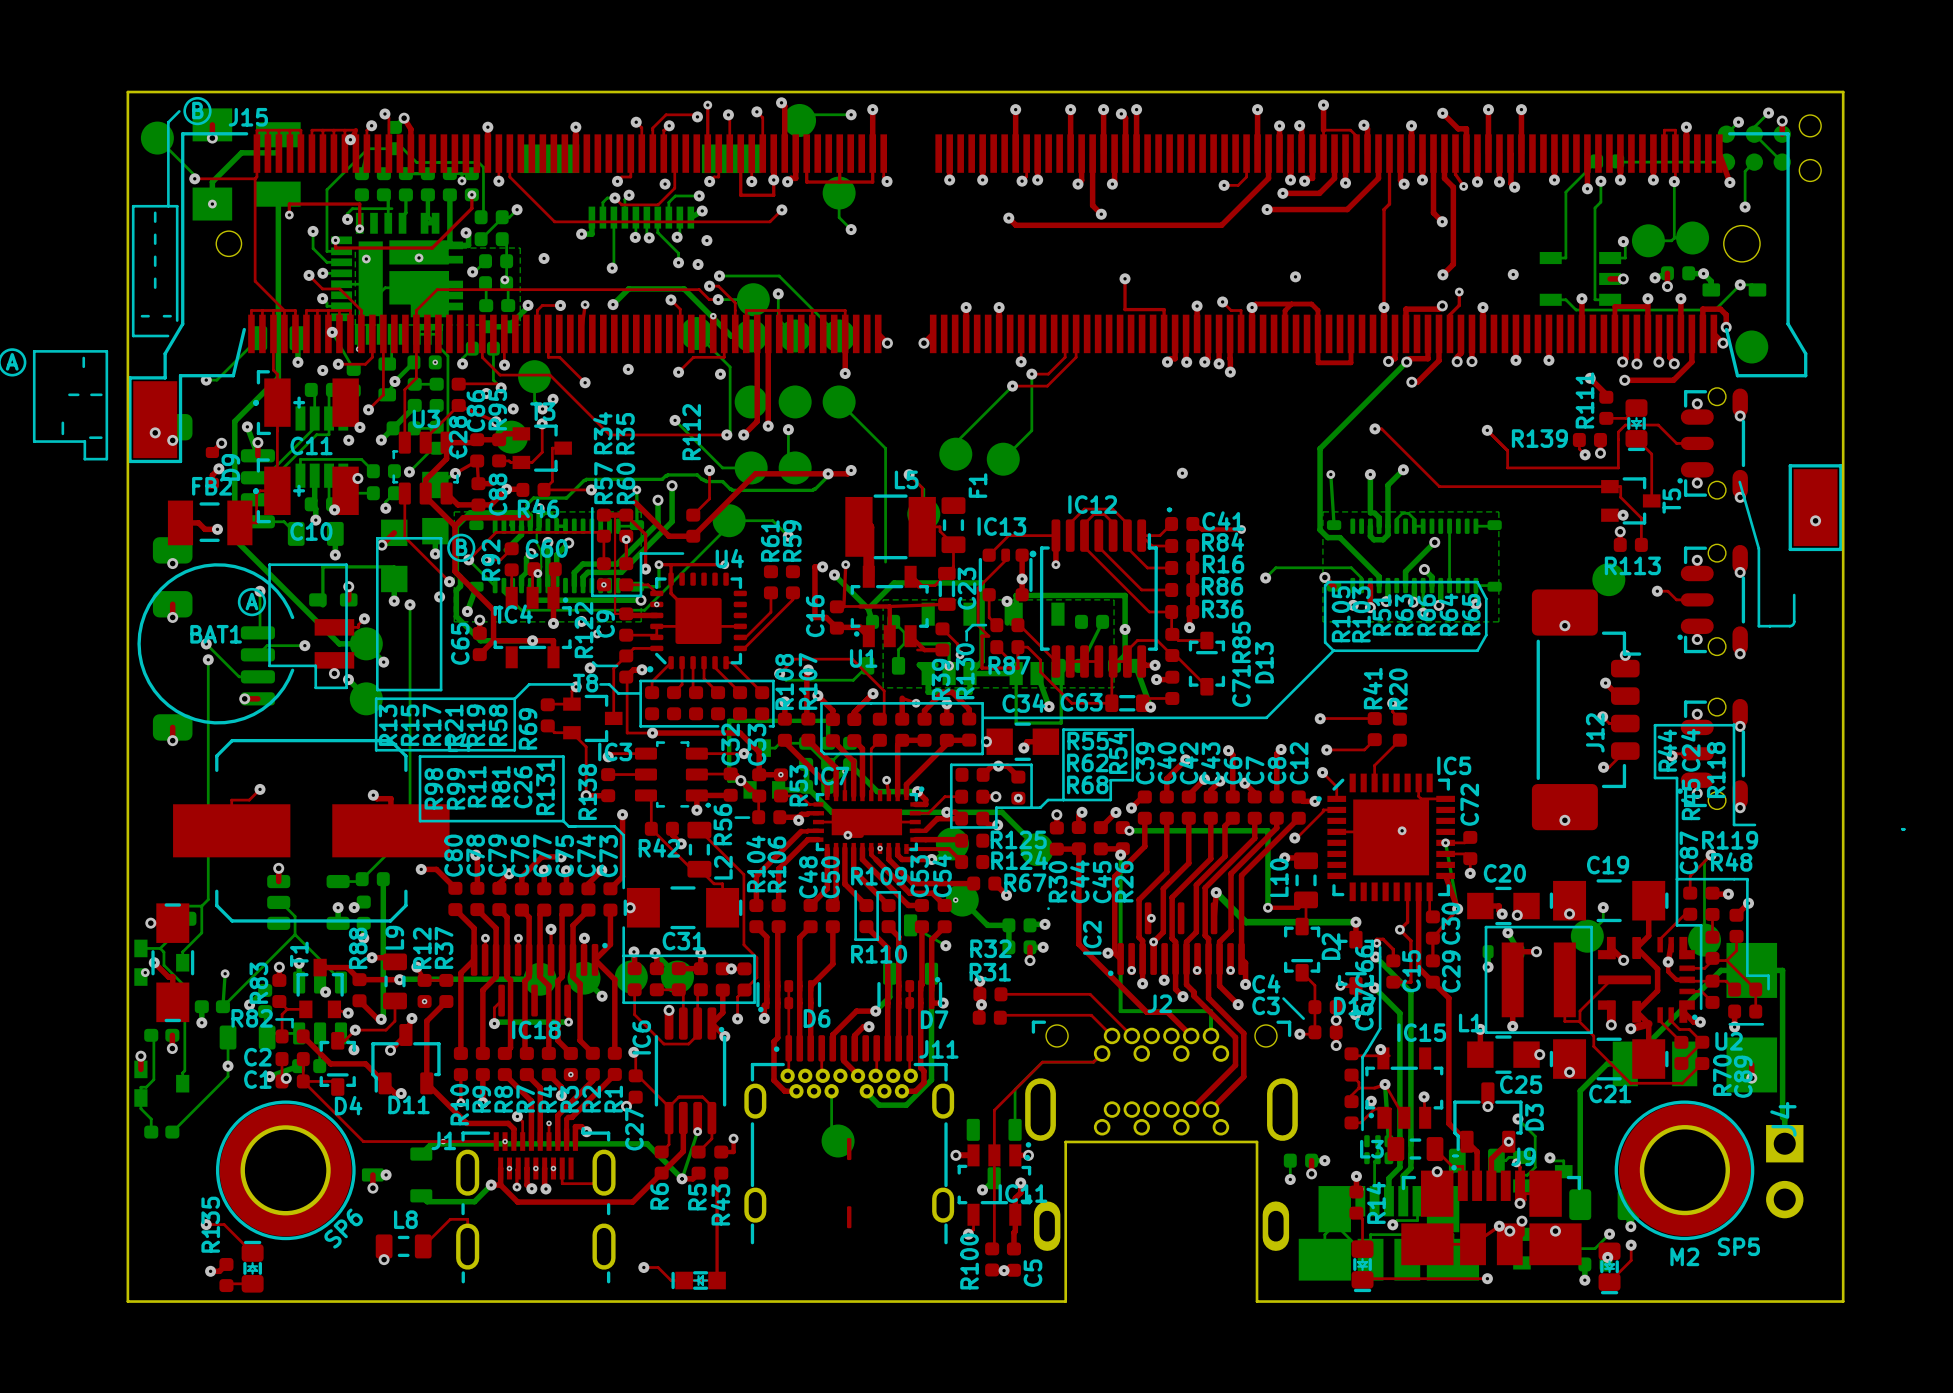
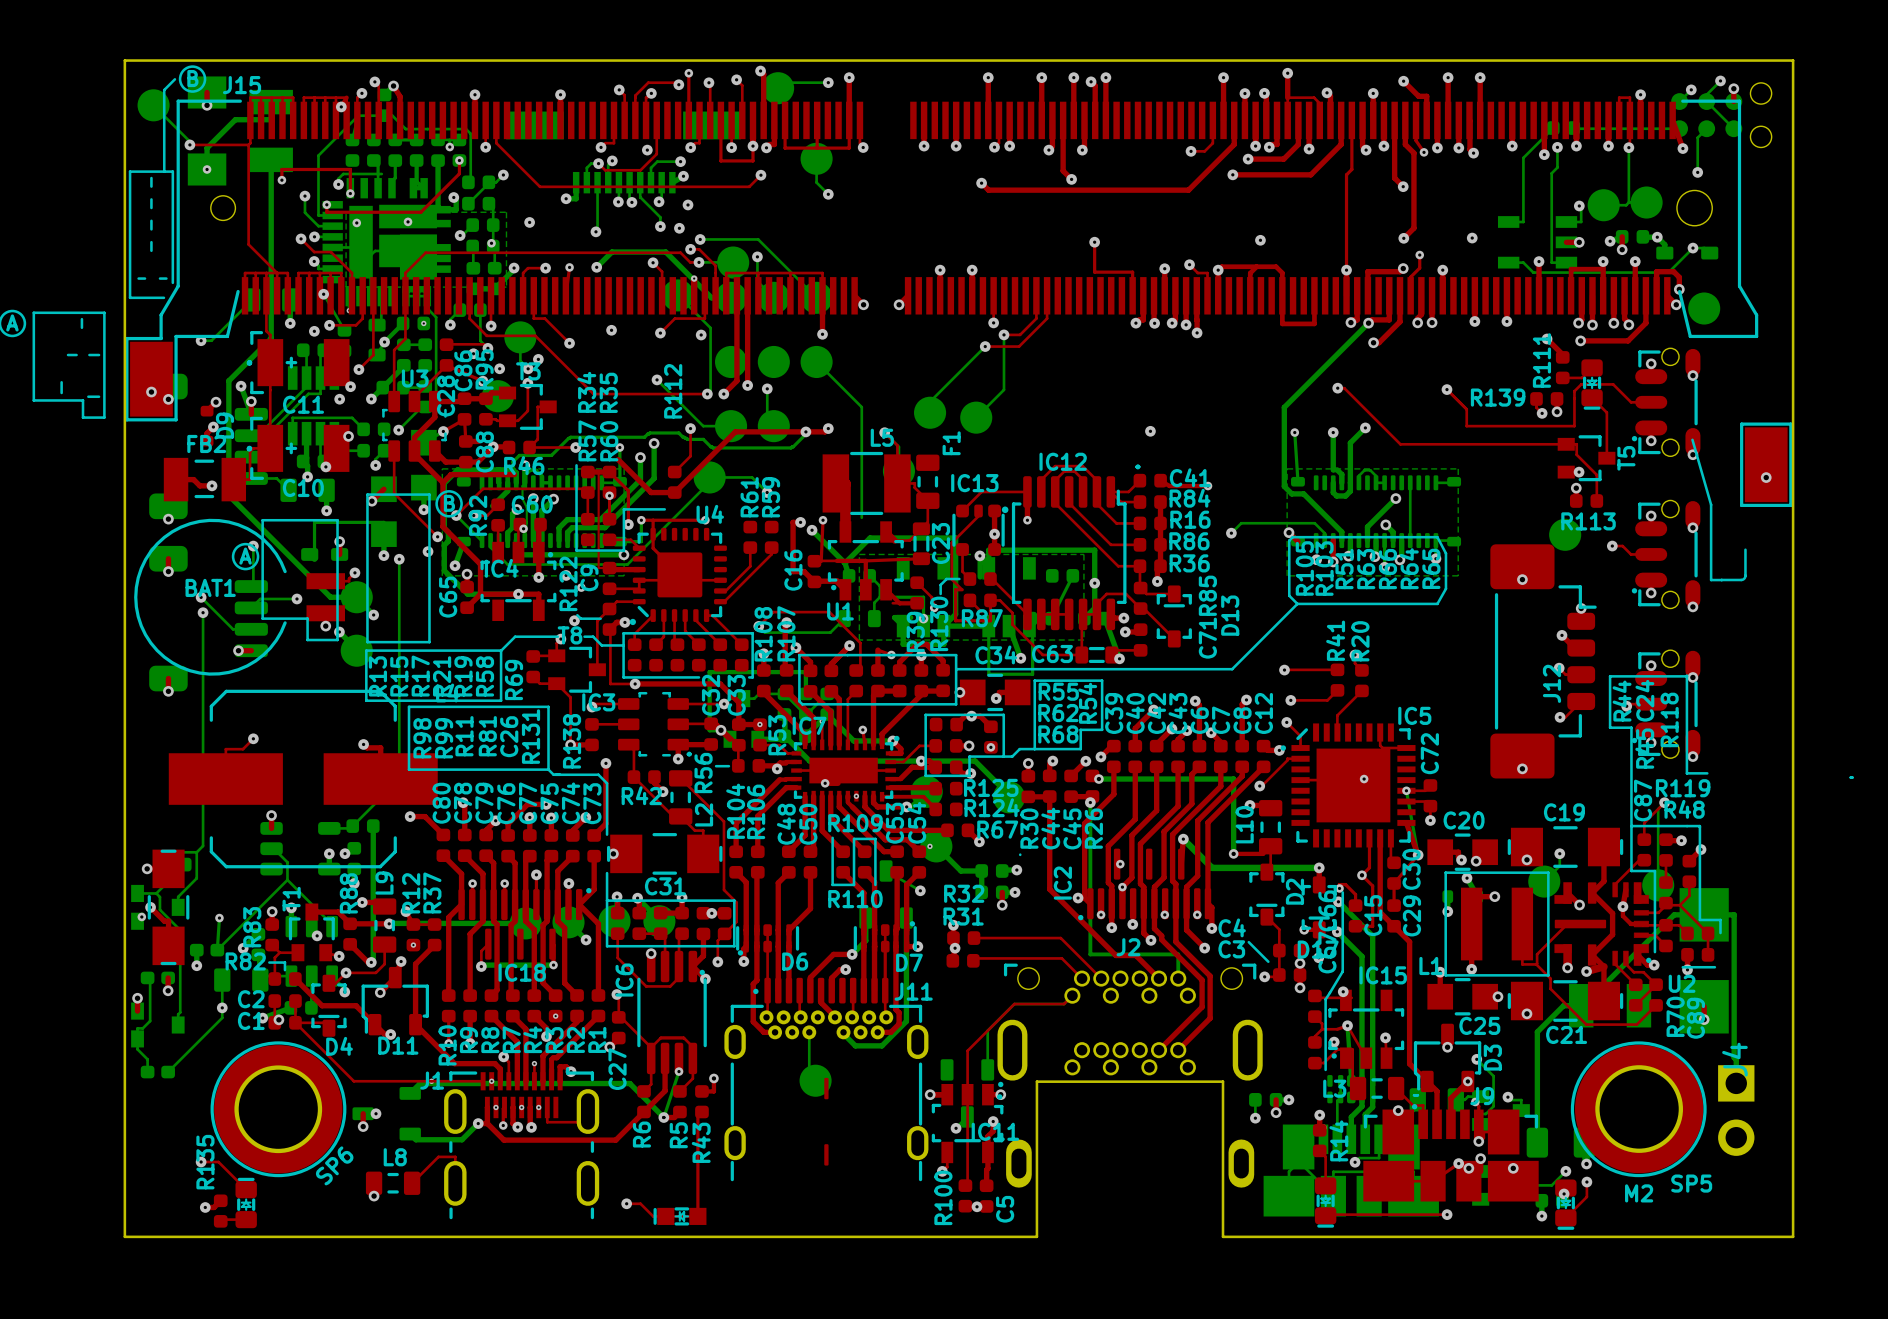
via: (603, 584) -> none
via: (656, 604) -> none

